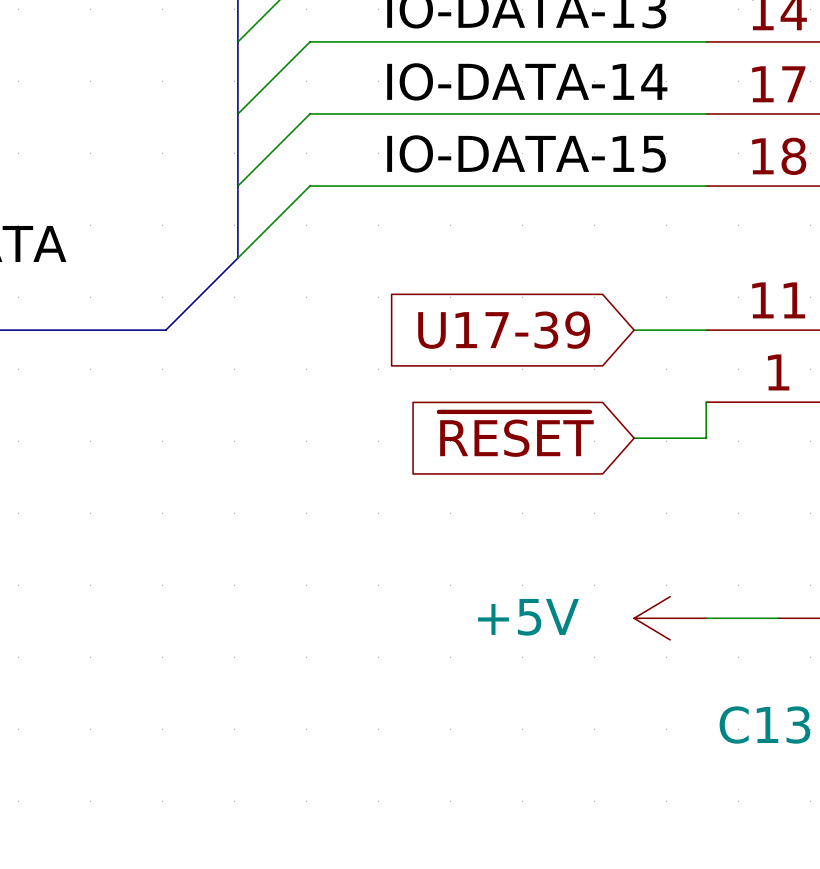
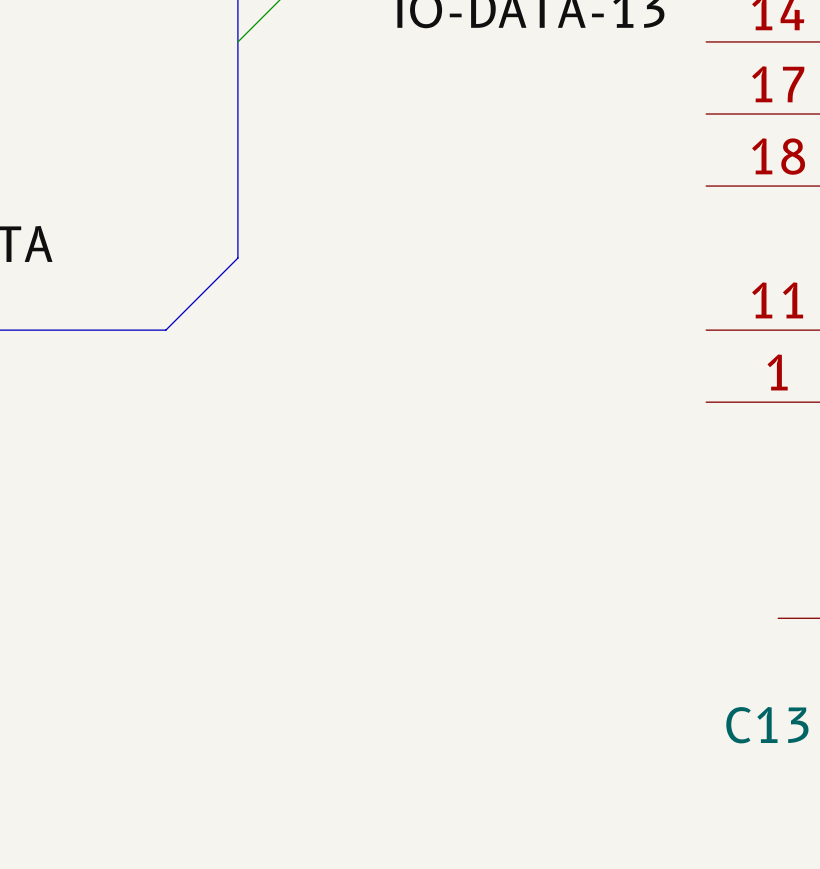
wire: (706, 41) (309, 41) (237, 114) -> none
label: IO-DATA-14 (527, 81) -> none
wire: (706, 114) (309, 114) (237, 186) -> none
label: IO-DATA-15 (526, 153) -> none
wire: (706, 186) (309, 186) (237, 258) -> none
global label: U17-39 (504, 330) -> none
wire: (634, 330) (706, 330) -> none
wire: (706, 402) (706, 438) (634, 438) -> none
global label: ~{RESET} (516, 434) -> none
power symbol: +5V (670, 618) -> none
wire: (706, 618) (778, 618) -> none

